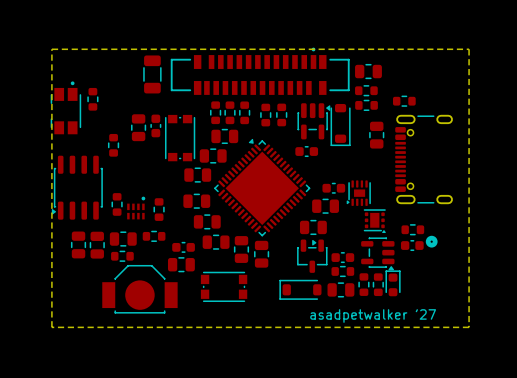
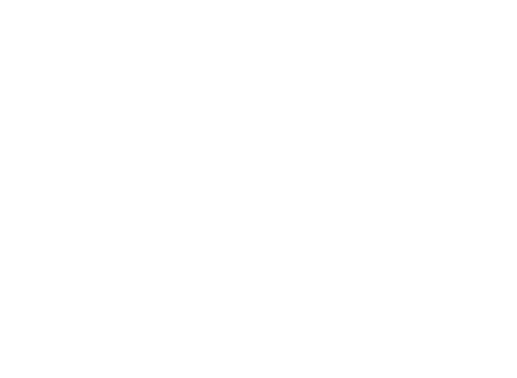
board edge: (51, 49) (469, 49) (469, 327) (51, 327) (51, 49) -> none
part: (260, 71) -> none
part: (368, 71) -> none
part: (152, 74) -> none
part: (366, 90) -> none
part: (92, 99) -> none
part: (404, 101) -> none
part: (366, 105) -> none
part: (65, 107) -> none
part: (215, 112) -> none
part: (229, 112) -> none
part: (244, 112) -> none
part: (281, 114) -> none
part: (265, 115) -> none
part: (313, 121) -> none
part: (340, 124) -> none
part: (155, 125) -> none
part: (138, 127) -> none
part: (376, 135) -> none
part: (224, 136) -> none
part: (180, 138) -> none
part: (113, 145) -> none
part: (306, 151) -> none
part: (213, 155) -> none
part: (424, 159) -> none
part: (197, 175) -> none
part: (77, 187) -> none
part: (262, 187) -> none
part: (333, 188) -> none
part: (358, 193) -> none
part: (196, 201) -> none
part: (117, 204) -> none
part: (325, 206) -> none
part: (136, 208) -> none
part: (159, 209) -> none
part: (207, 221) -> none
part: (374, 221) -> none
part: (313, 227) -> none
part: (412, 229) -> none
part: (154, 236) -> none
part: (123, 239) -> none
part: (431, 241) -> none
part: (216, 242) -> none
part: (78, 244) -> none
part: (97, 245) -> none
part: (412, 245) -> none
part: (183, 247) -> none
part: (241, 249) -> none
part: (377, 253) -> none
part: (261, 254) -> none
part: (122, 256) -> none
part: (312, 256) -> none
part: (342, 257) -> none
part: (181, 264) -> none
part: (342, 271) -> none
part: (393, 283) -> none
part: (363, 284) -> none
part: (378, 284) -> none
part: (224, 286) -> none
part: (139, 289) -> none
part: (300, 289) -> none
part: (340, 289) -> none
text: asadpetwalker '27 (373, 316) -> none

